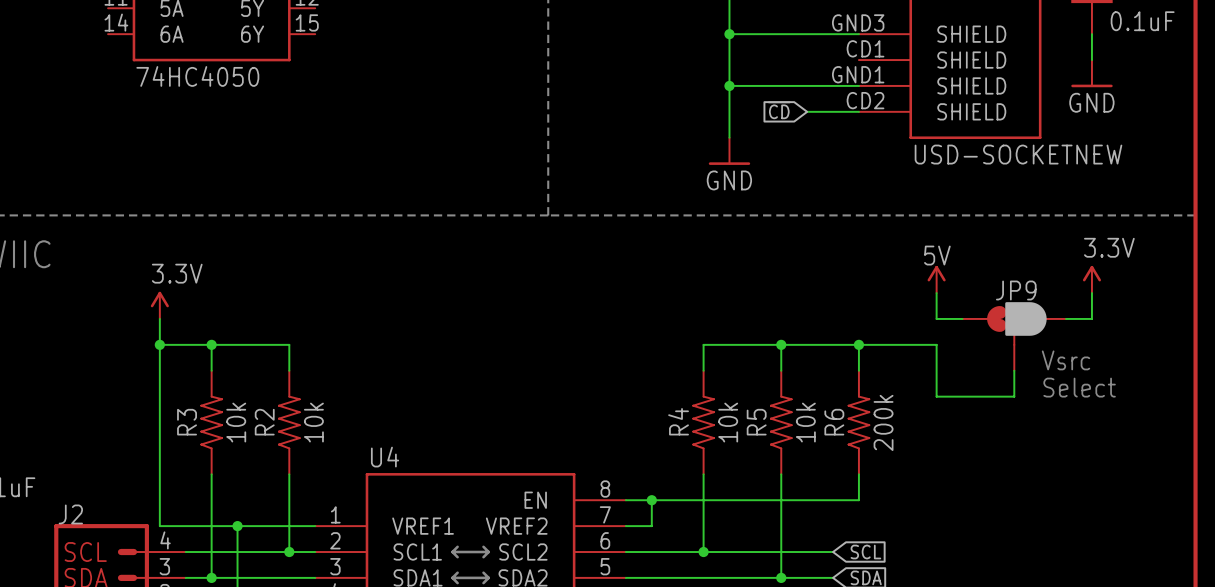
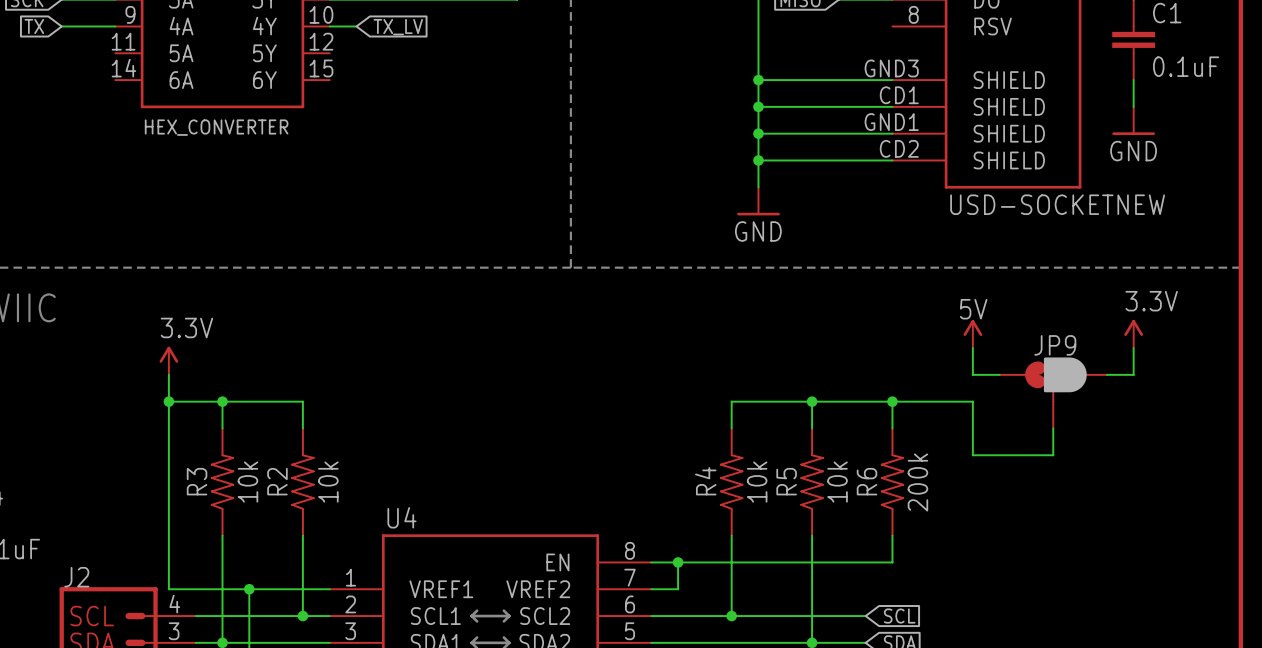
wire: none -> (758, 106) (892, 106)
junction: none -> (758, 106)
part value: 74HC4050 (197, 76) -> HEX_CONVERTER (216, 127)
global label: ~{CD} (779, 110) -> none
wire: none -> (758, 160) (838, 160)
junction: none -> (758, 160)
text: Vsrc (1066, 360) -> none
text: Select (1079, 387) -> none

